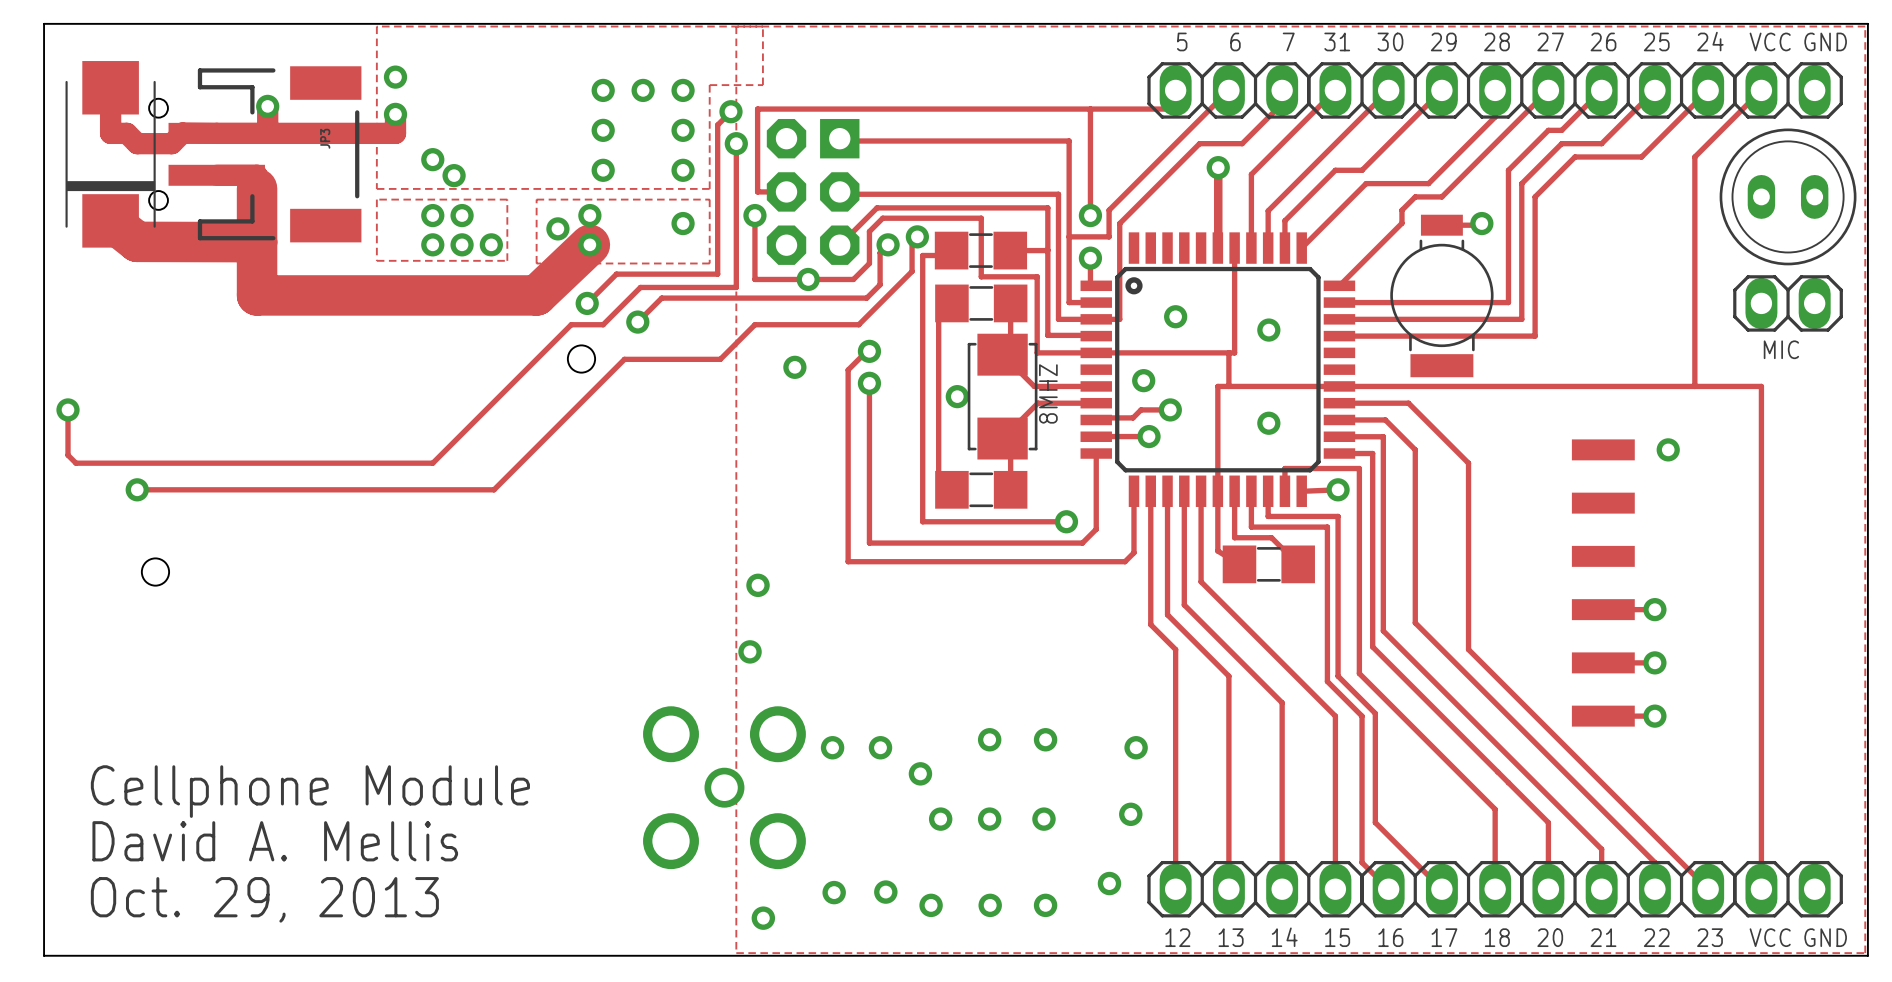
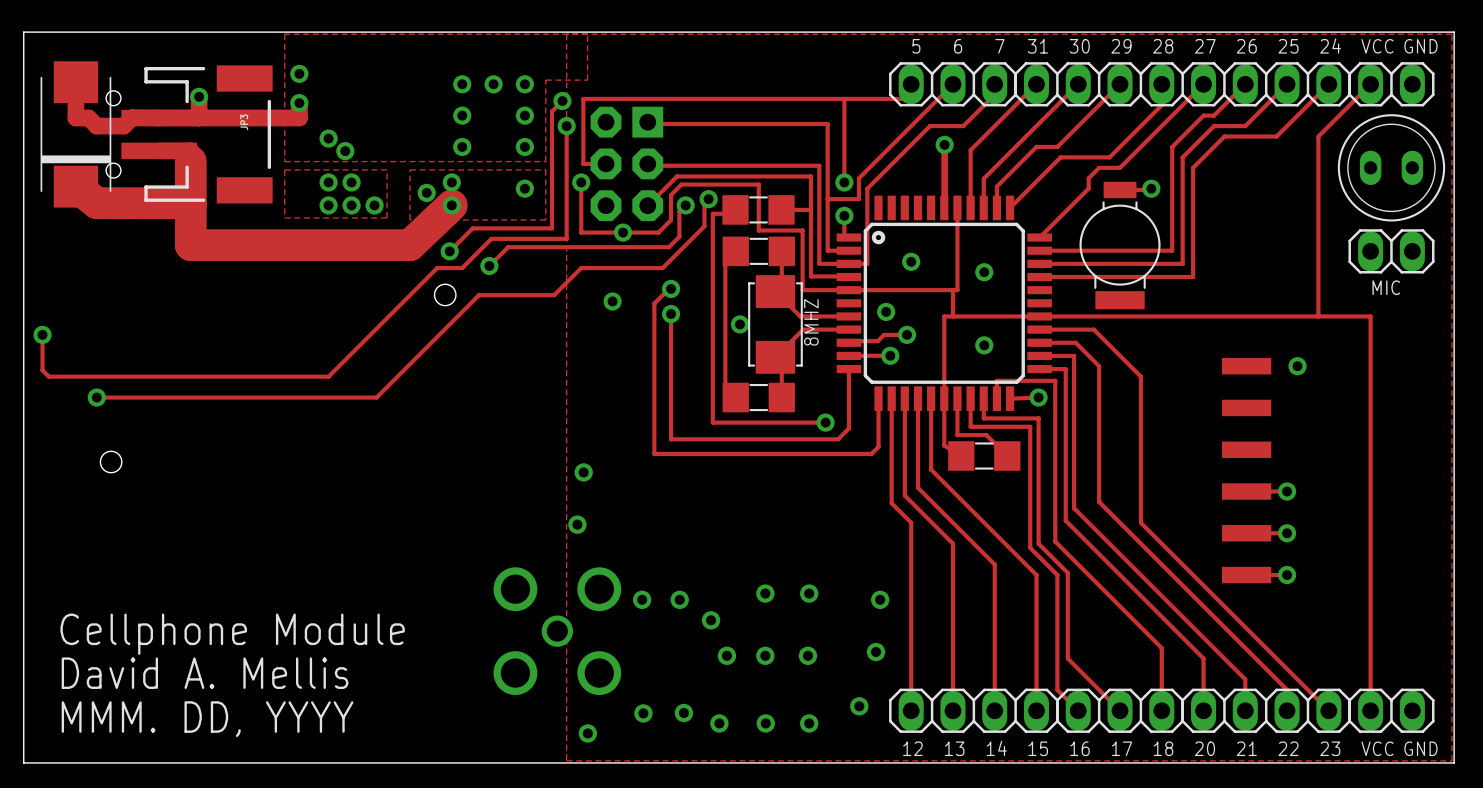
text: Oct. 29, 2013 (264, 899) -> MMM. DD, YYYY (207, 719)

